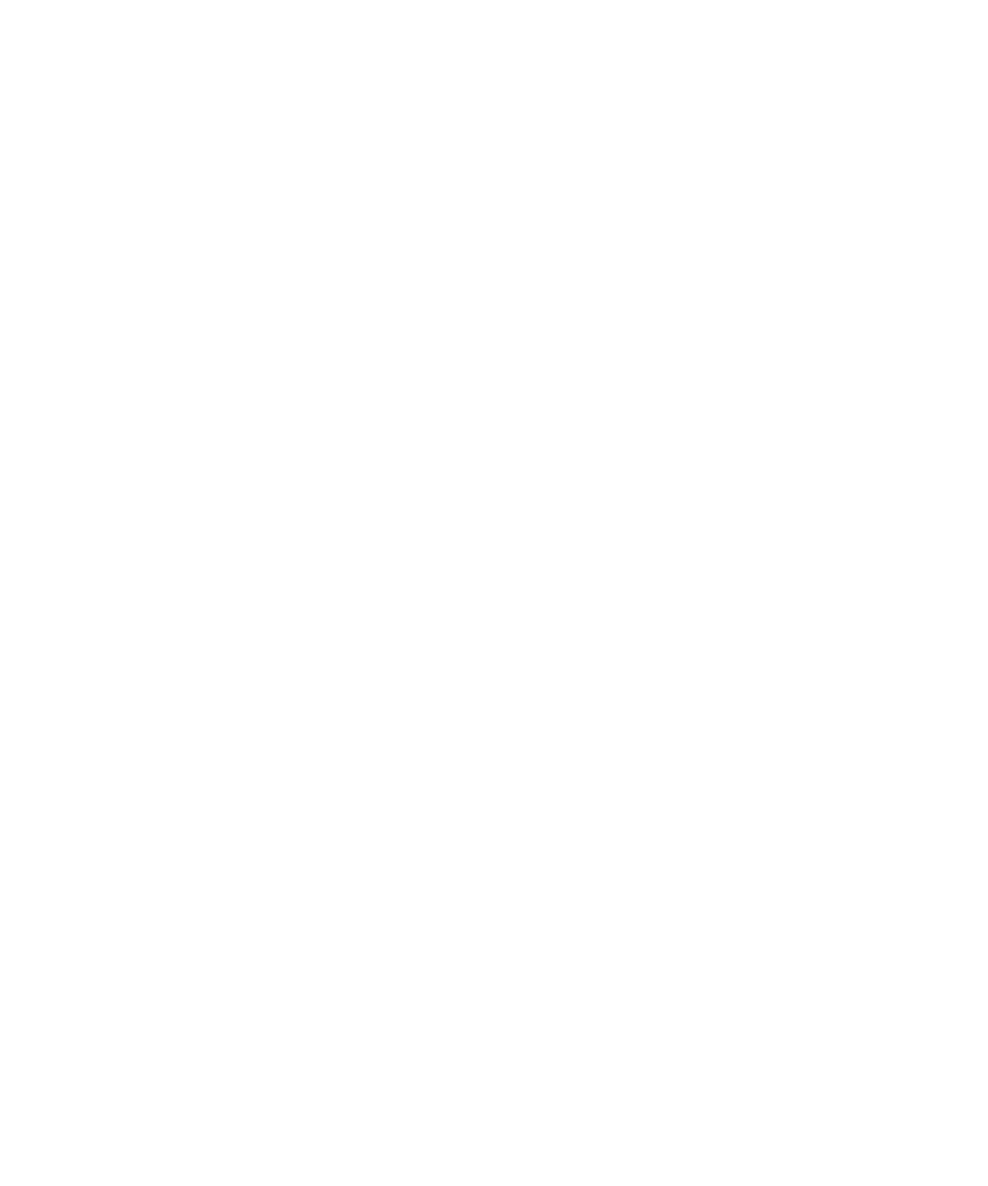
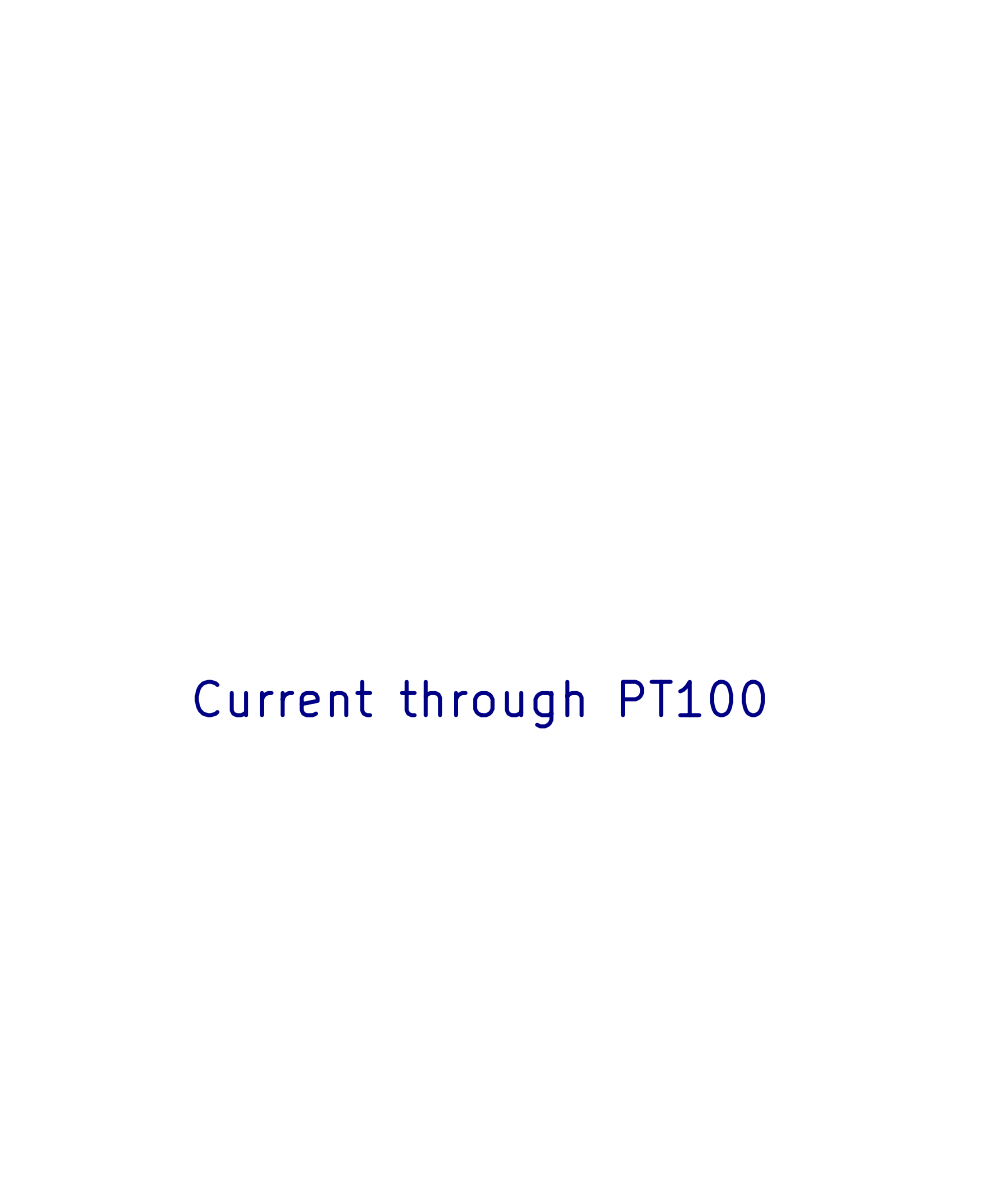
text: none -> Current through PT100 (479, 704)

